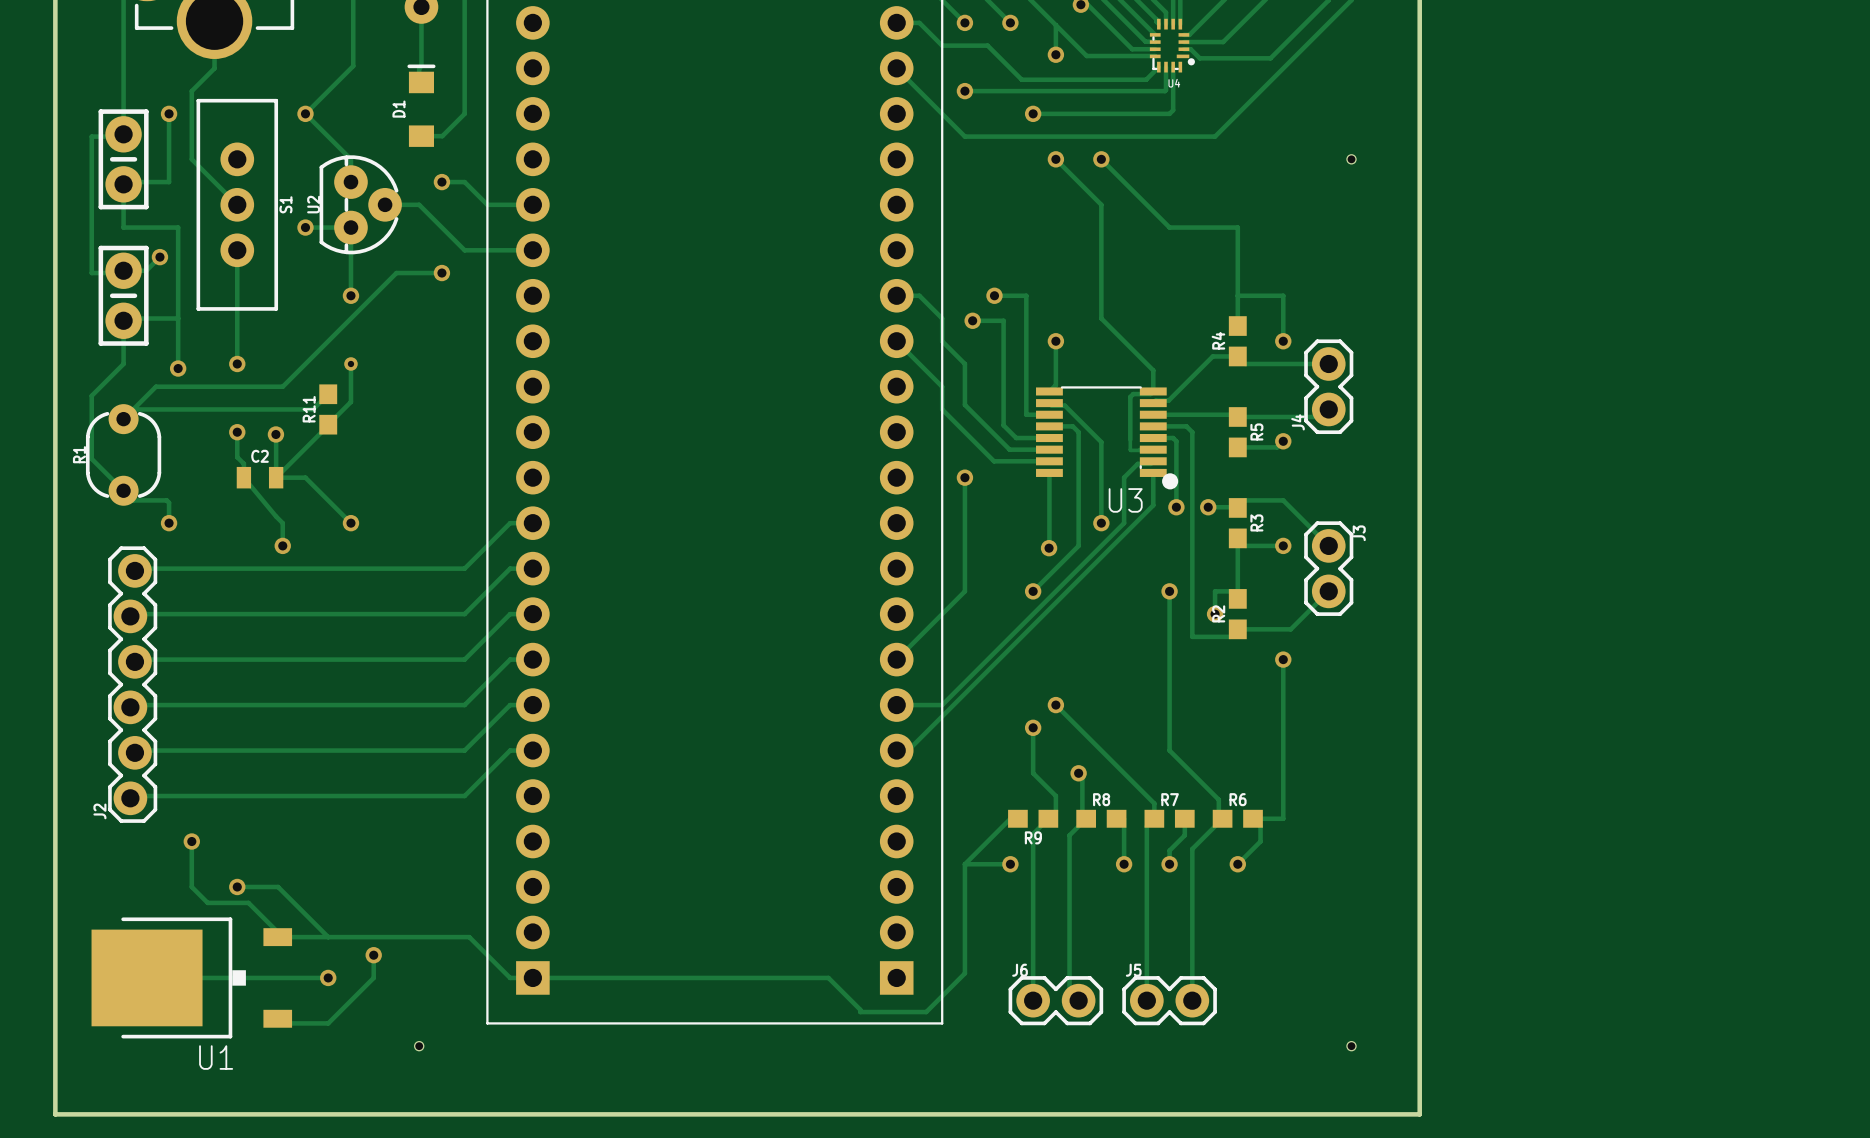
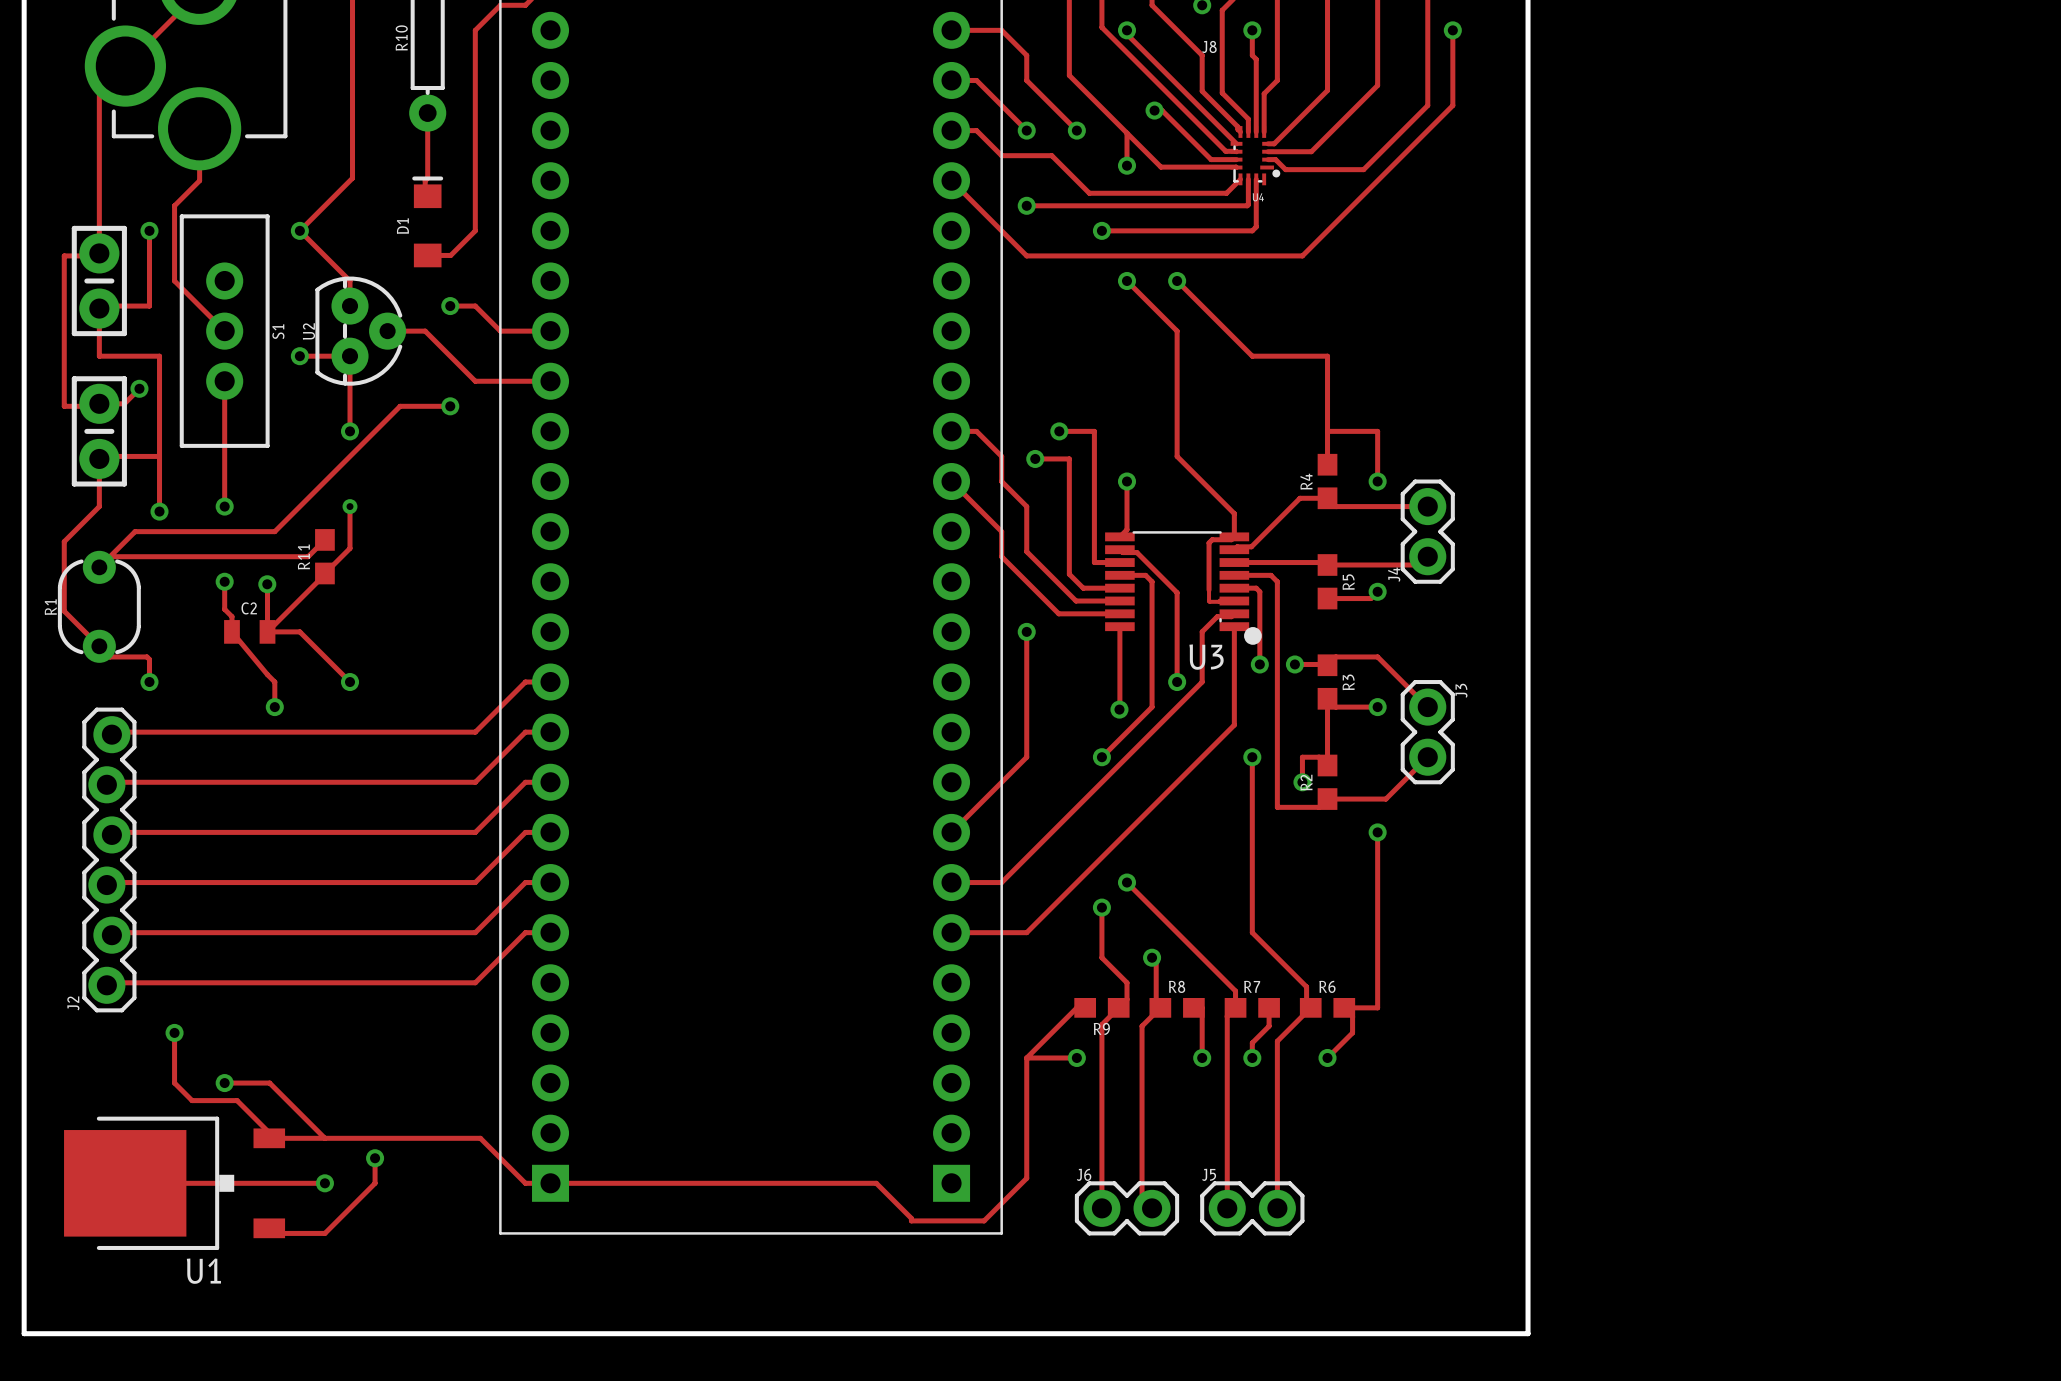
hole: (1351, 159) -> none
track: (1153, 505) (908, 750) -> (1234, 662) (1234, 725) (1026, 932) (964, 932)
hole: (419, 1046) -> none
hole: (1351, 1046) -> none

